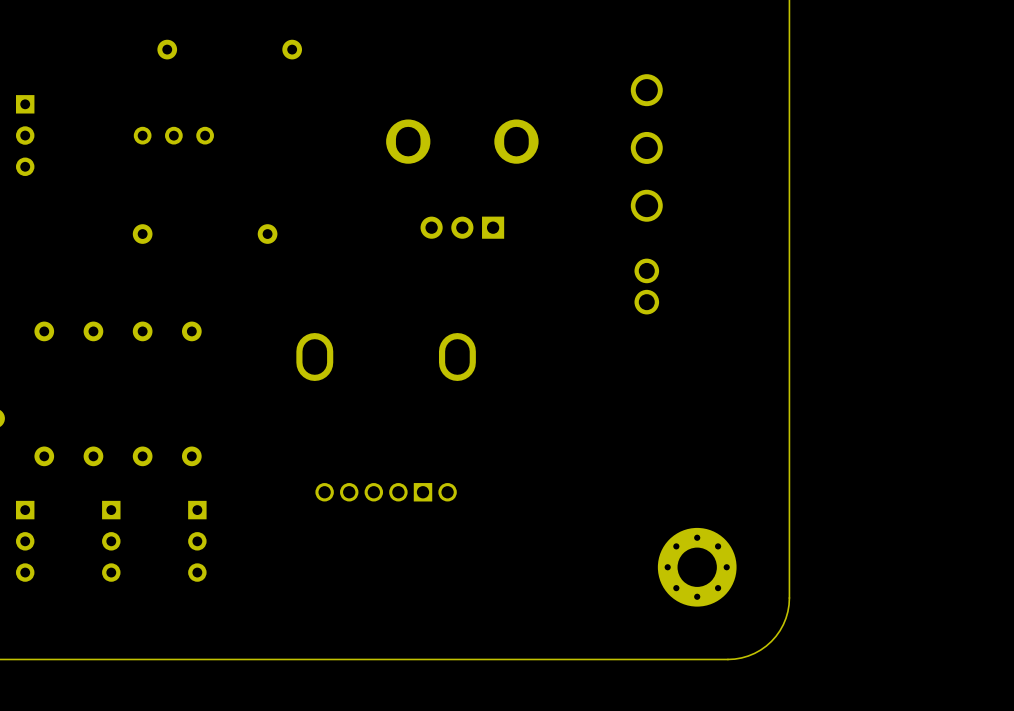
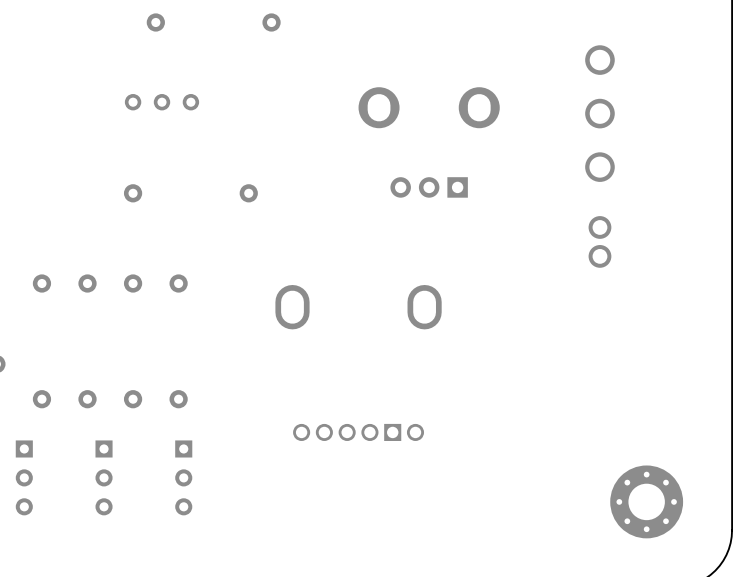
part: (25, 135) -> none

